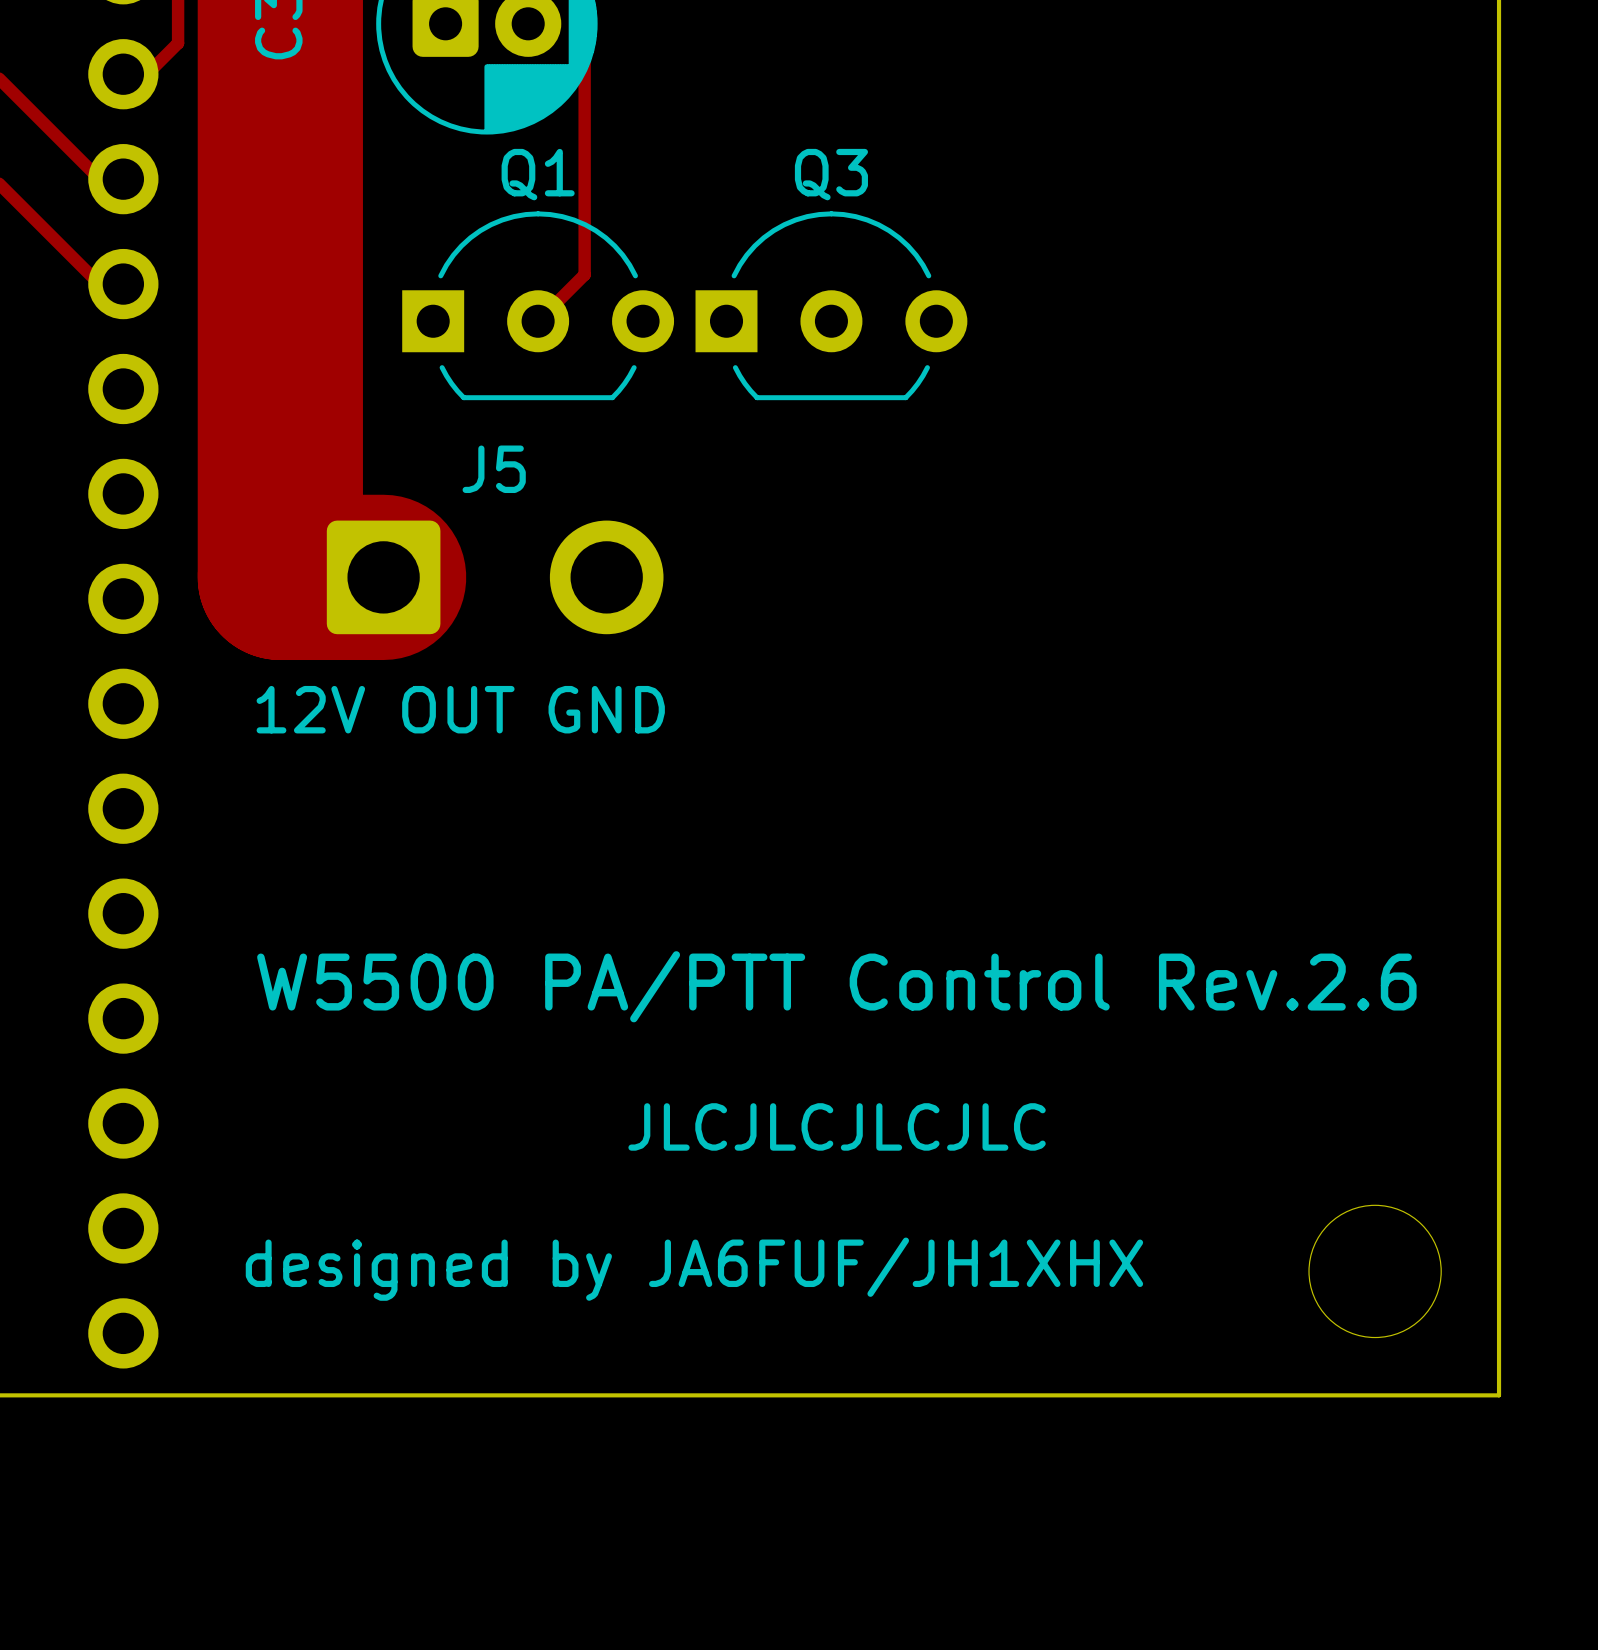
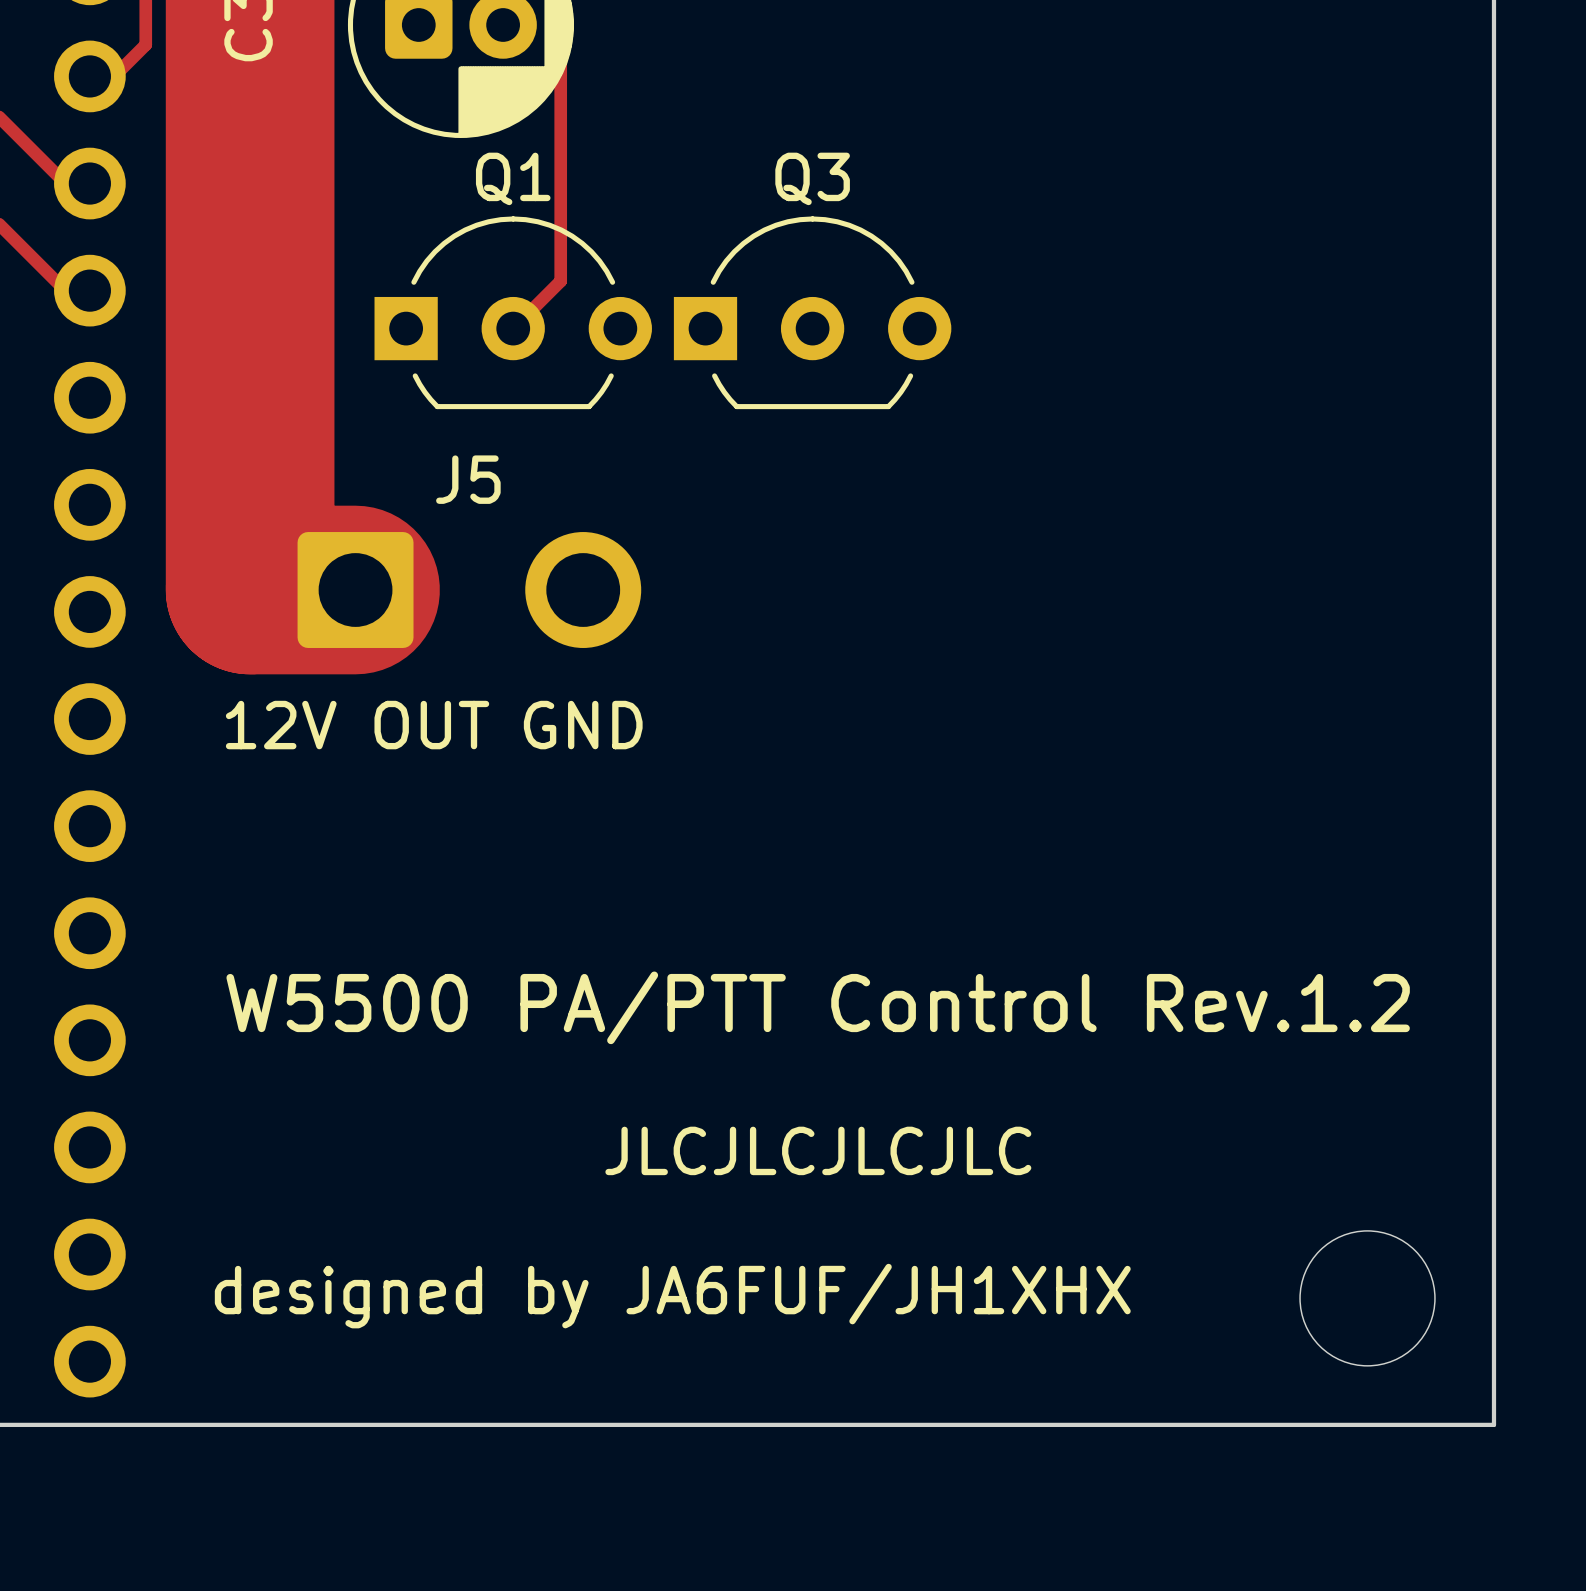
text: W5500 PA/PTT Control Rev.2.6 (836, 986) -> W5500 PA/PTT Control Rev.1.2 (818, 1007)

